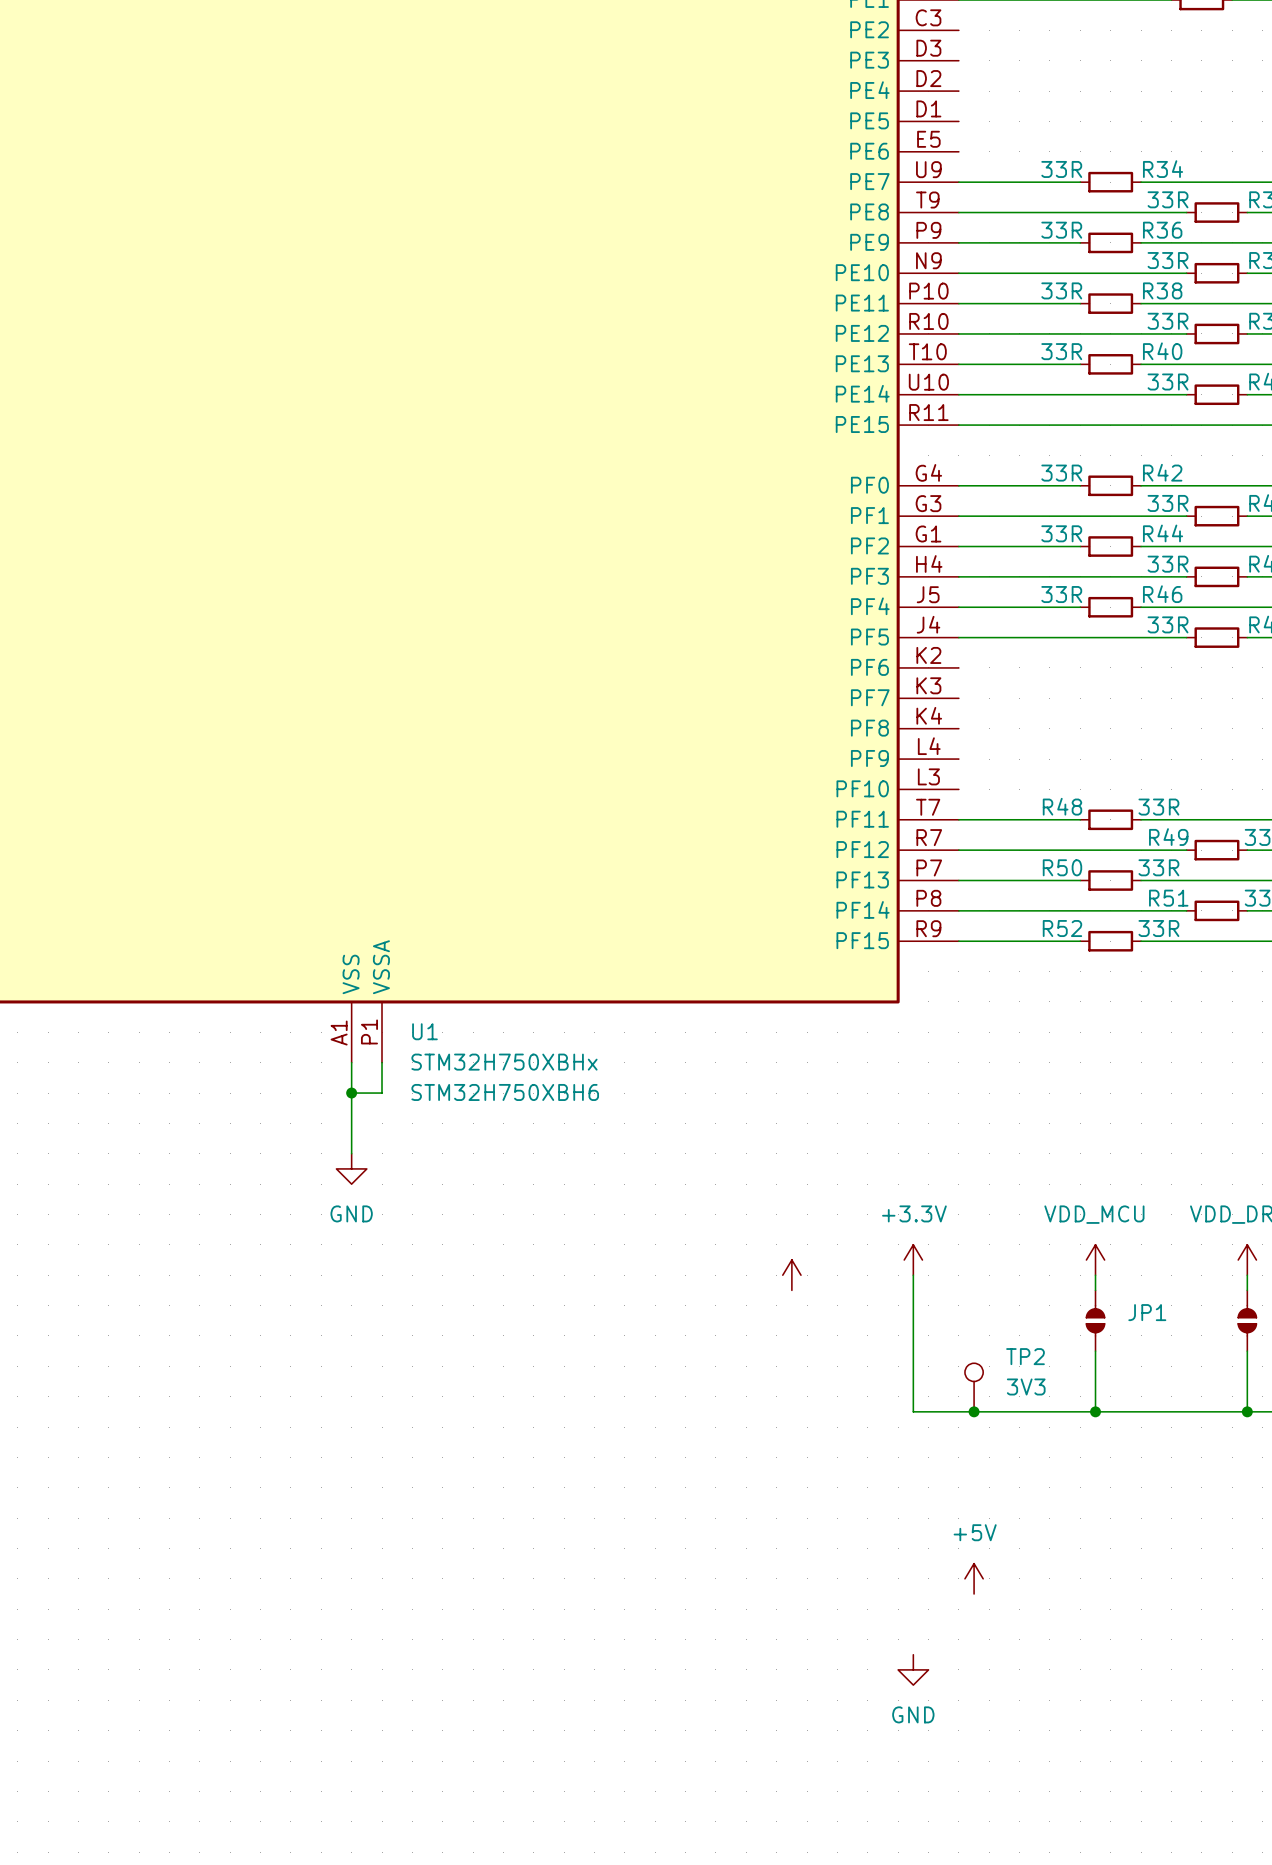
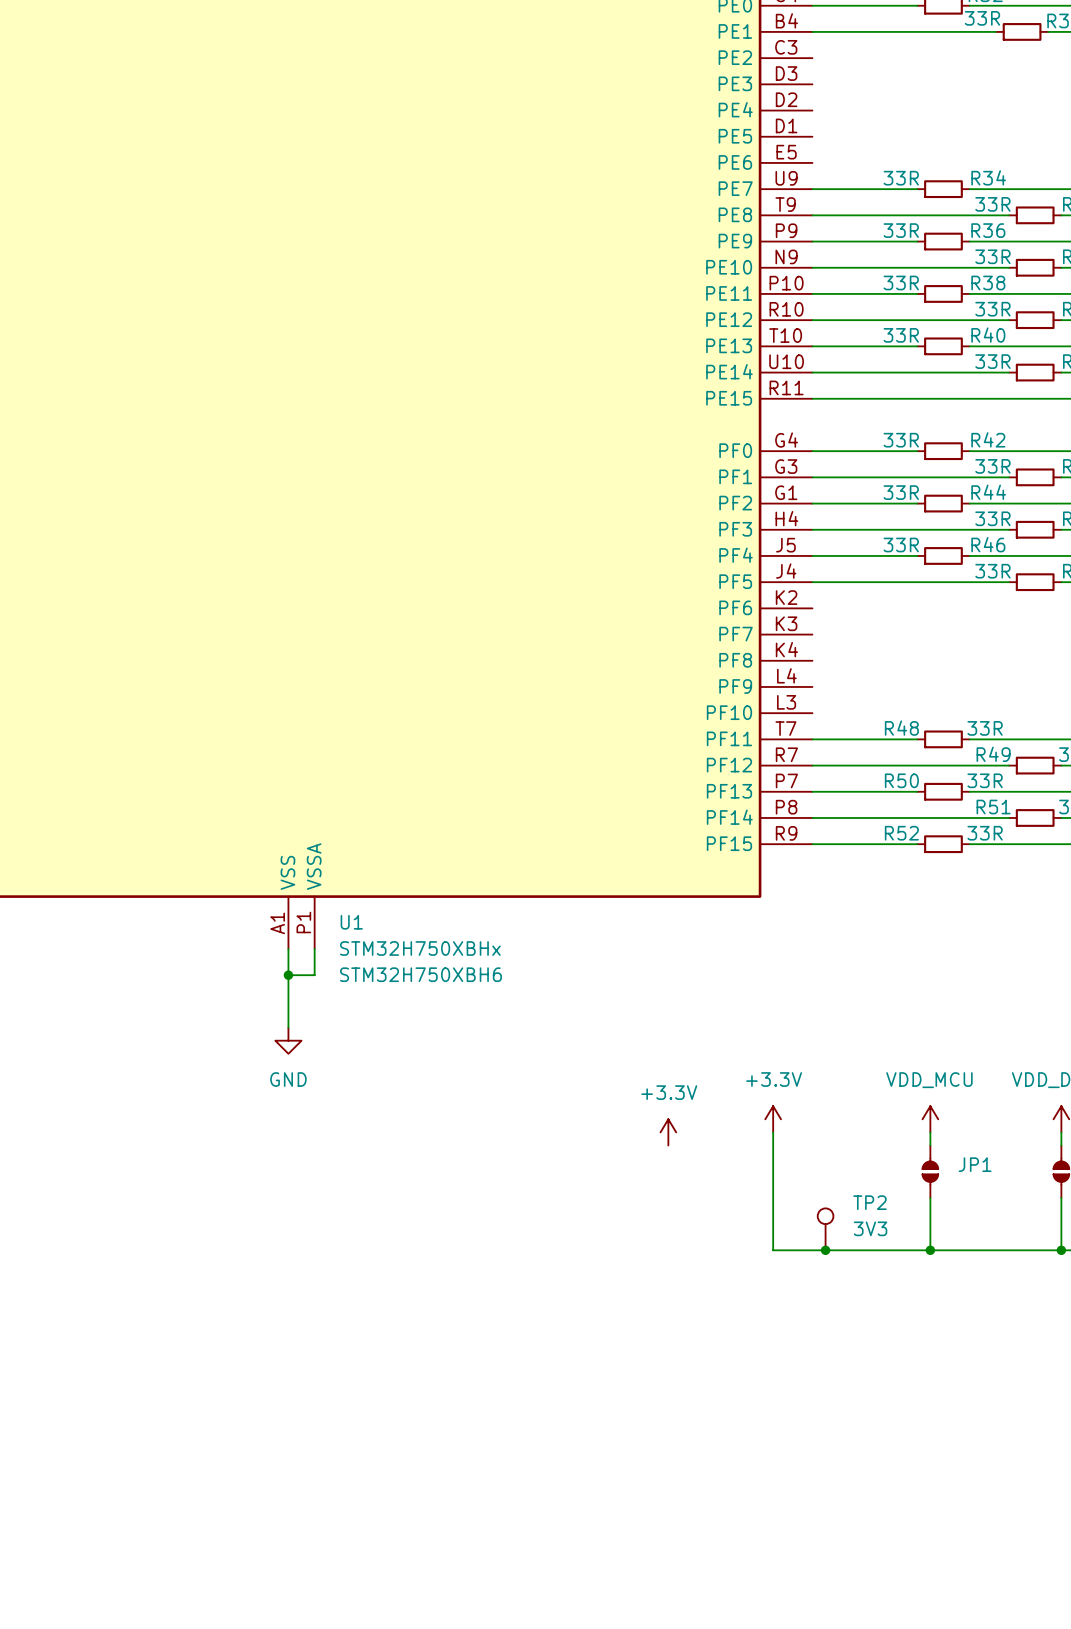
power symbol text: none -> +3.3V (669, 1092)
power symbol: +5V (974, 1578) -> none
power symbol: GND (913, 1669) -> none

